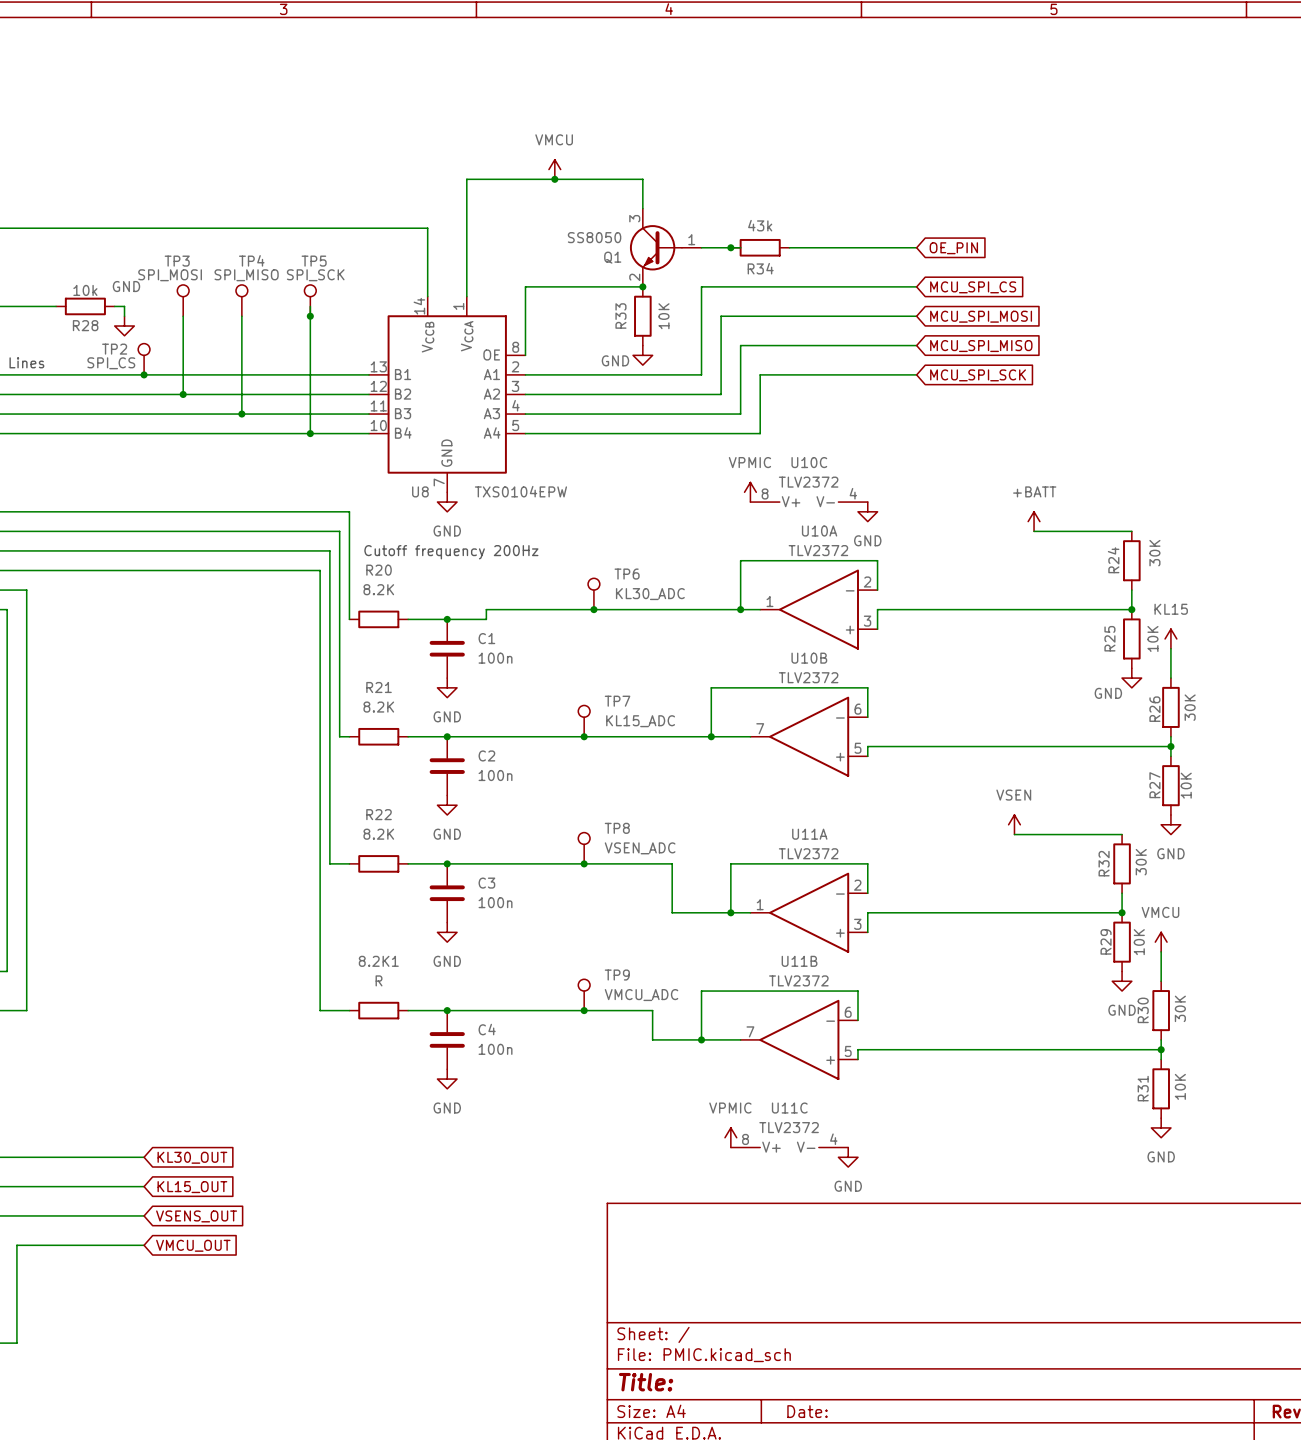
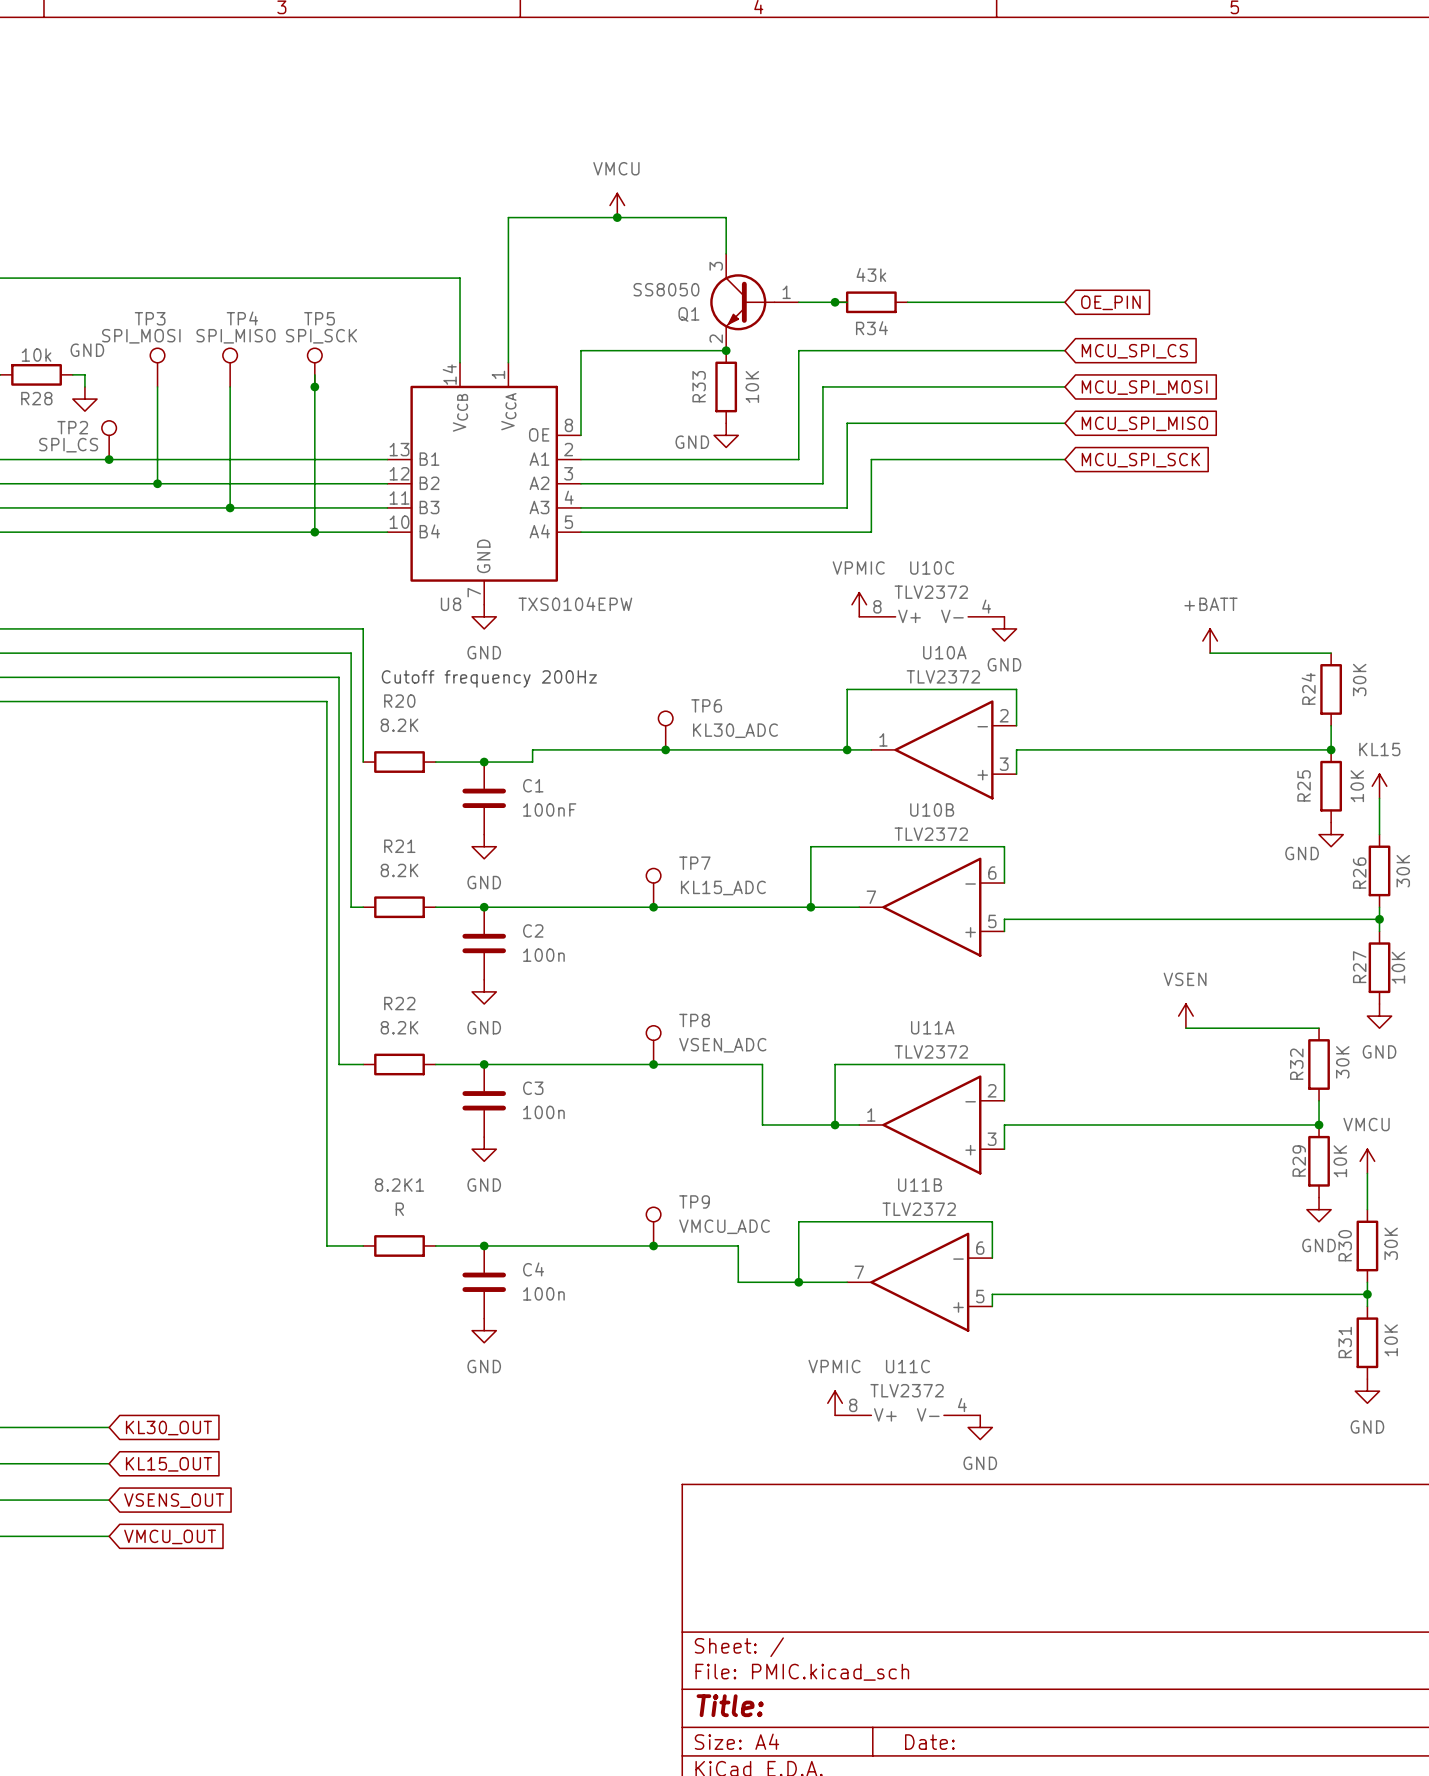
C1 value: 100n (495, 658) -> 100nF (549, 809)

